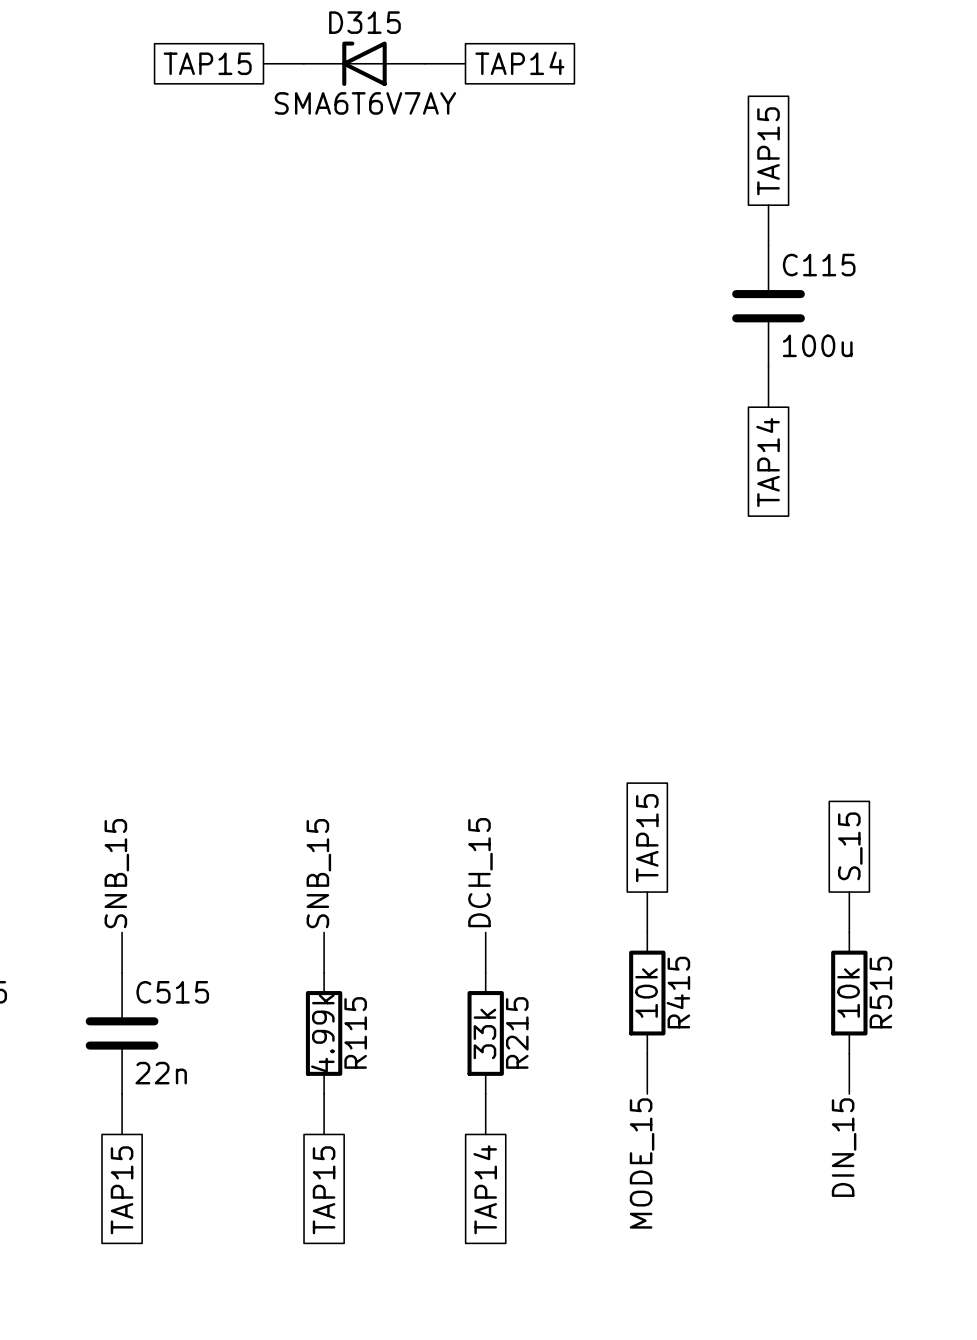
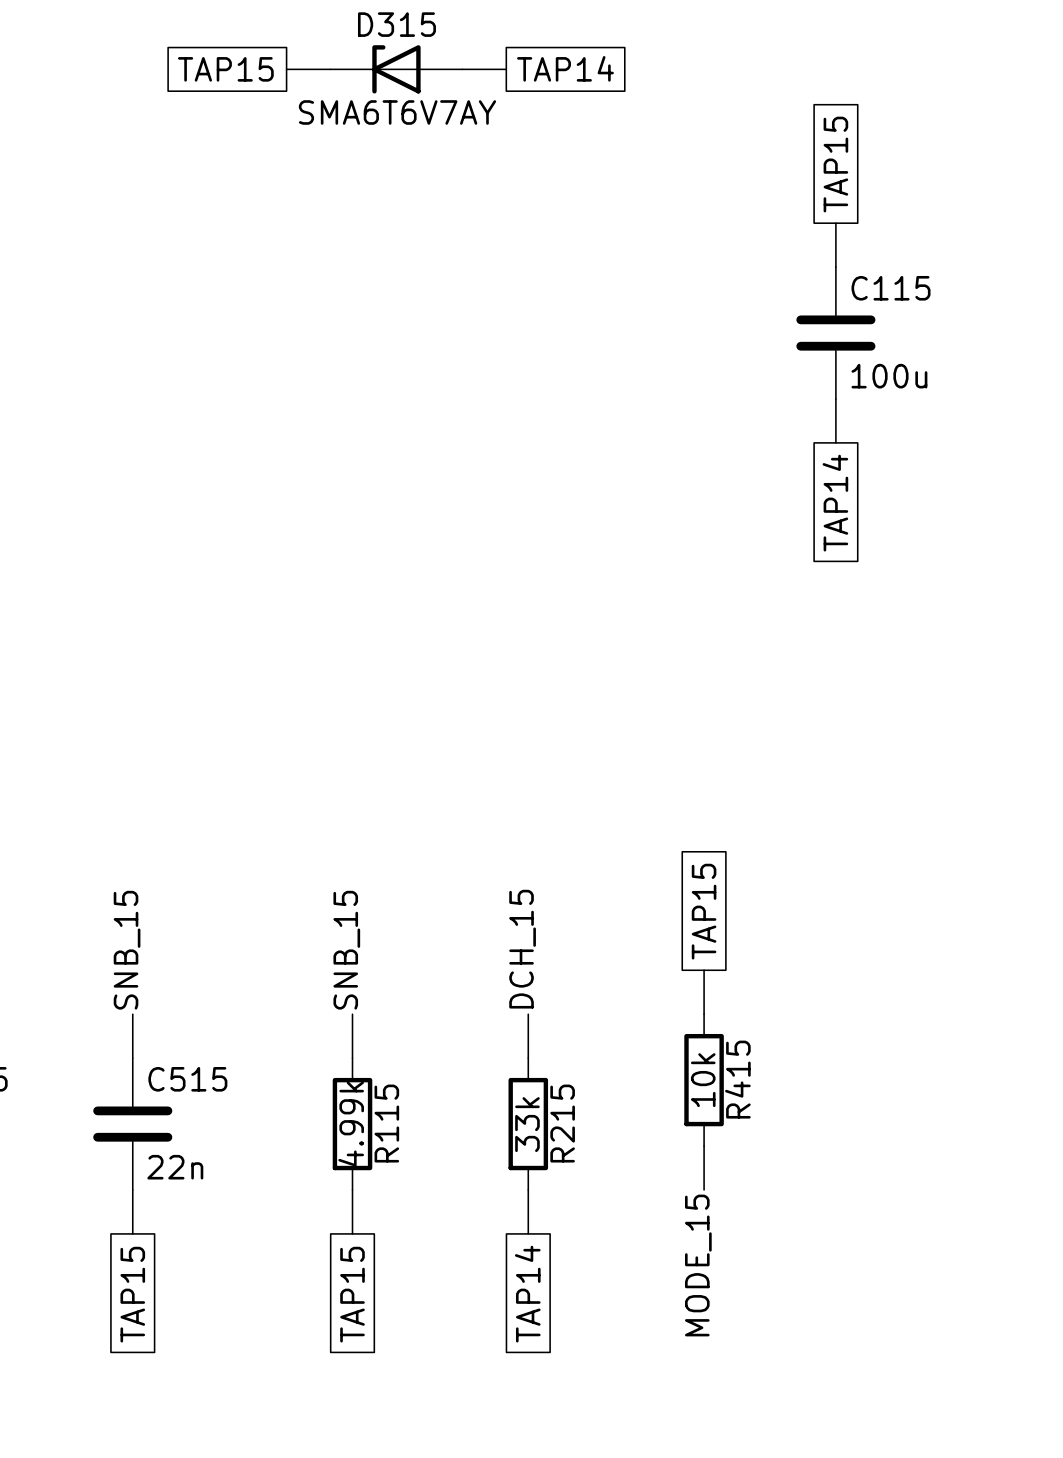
global label: S_15 (850, 846) -> none
wire: (849, 892) (849, 932) -> none
R515: 10k (849, 993) -> none
wire: (849, 1053) (849, 1094) -> none
label: DIN_15 (844, 1147) -> none

